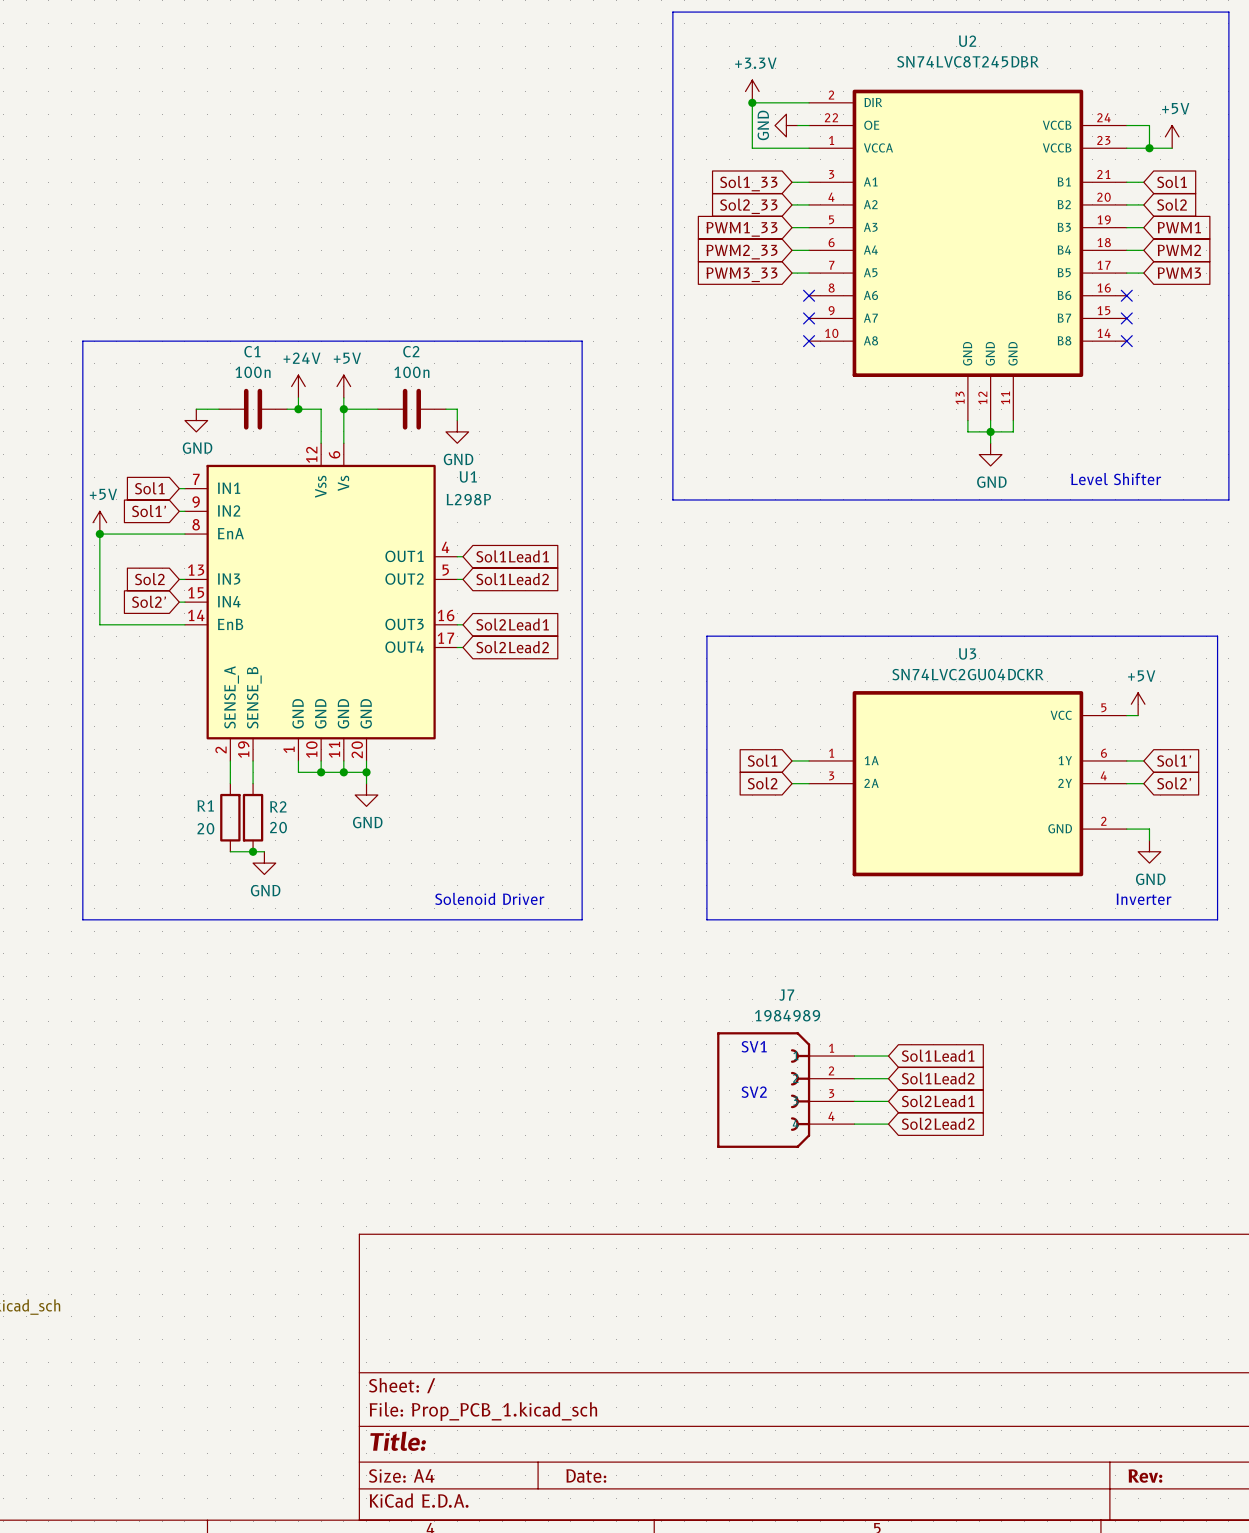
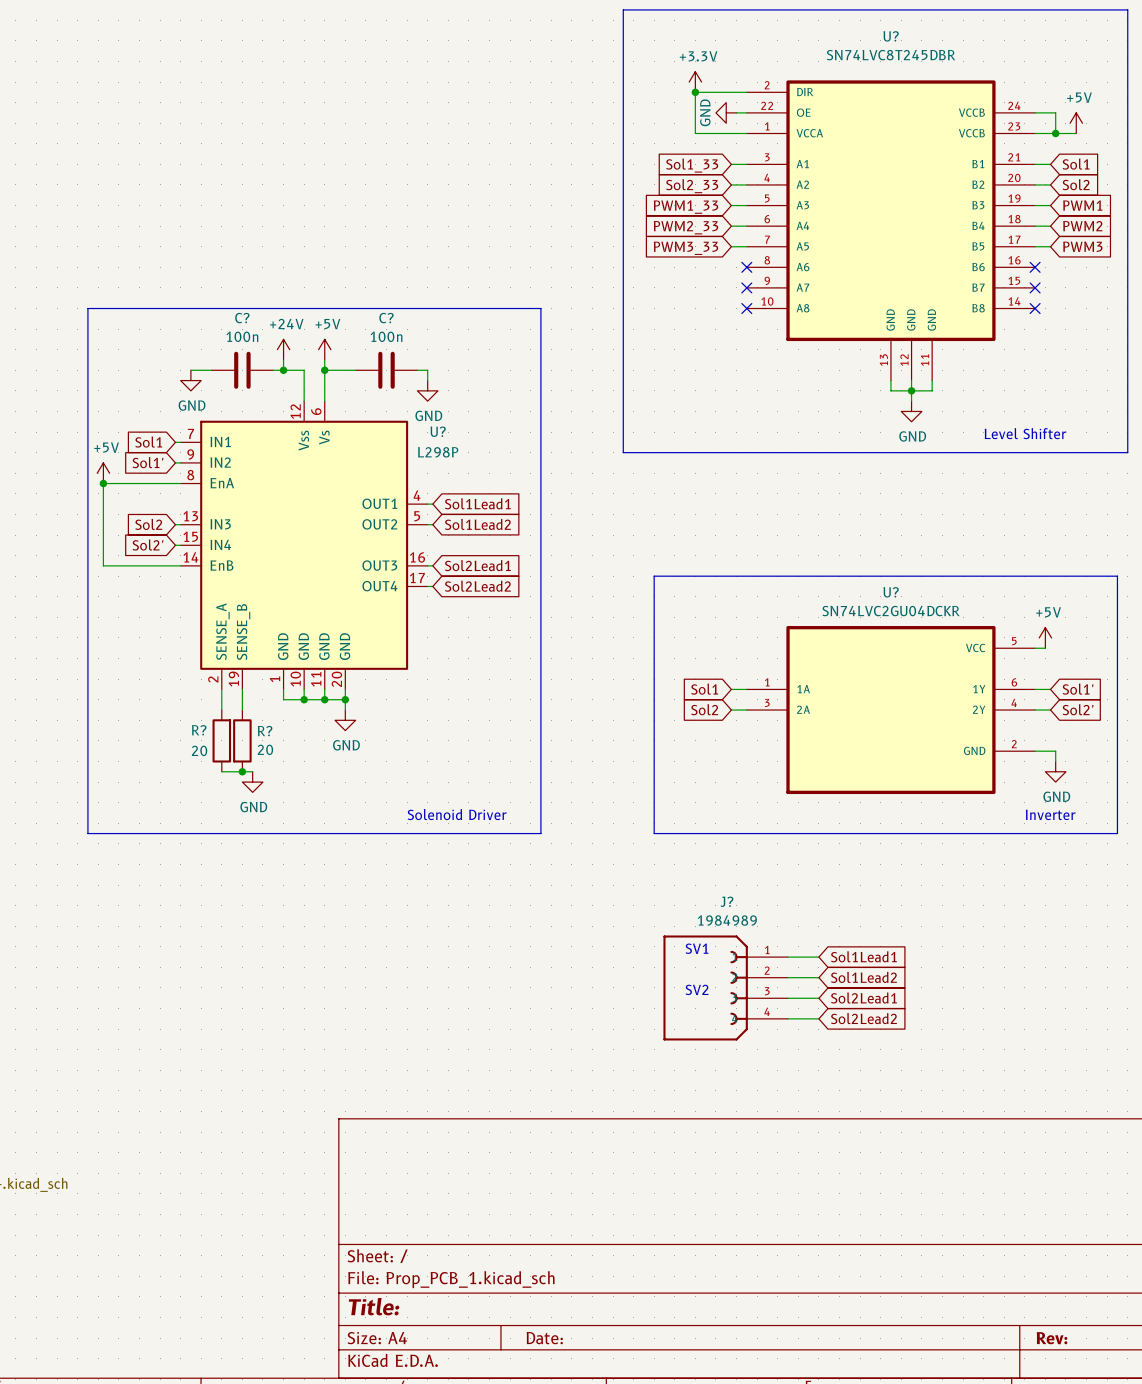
U2 name: U2 (967, 41) -> U? (891, 36)
C1 name: C1 (252, 351) -> C? (242, 318)
C2 name: C2 (411, 351) -> C? (386, 318)
U1 name: U1 (468, 476) -> U? (438, 431)
U3 name: U3 (967, 653) -> U? (891, 592)
R1 name: R1 (205, 805) -> R? (199, 730)
R2 name: R2 (278, 806) -> R? (265, 731)
J7 name: J7 (786, 995) -> J? (726, 901)

